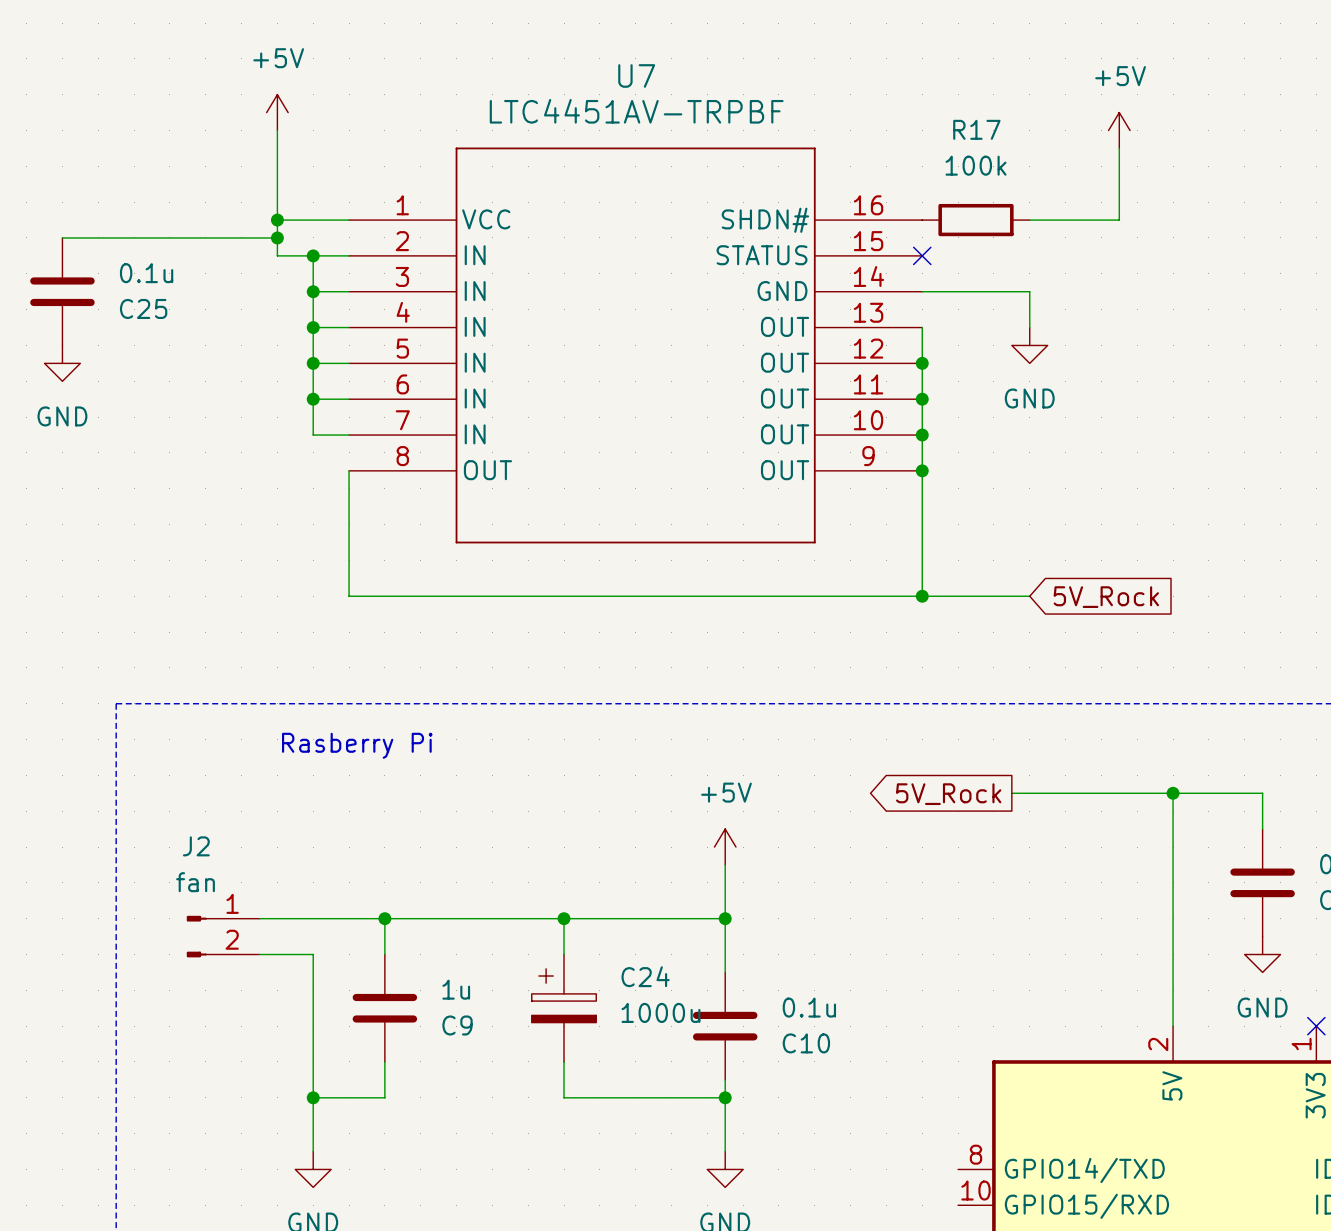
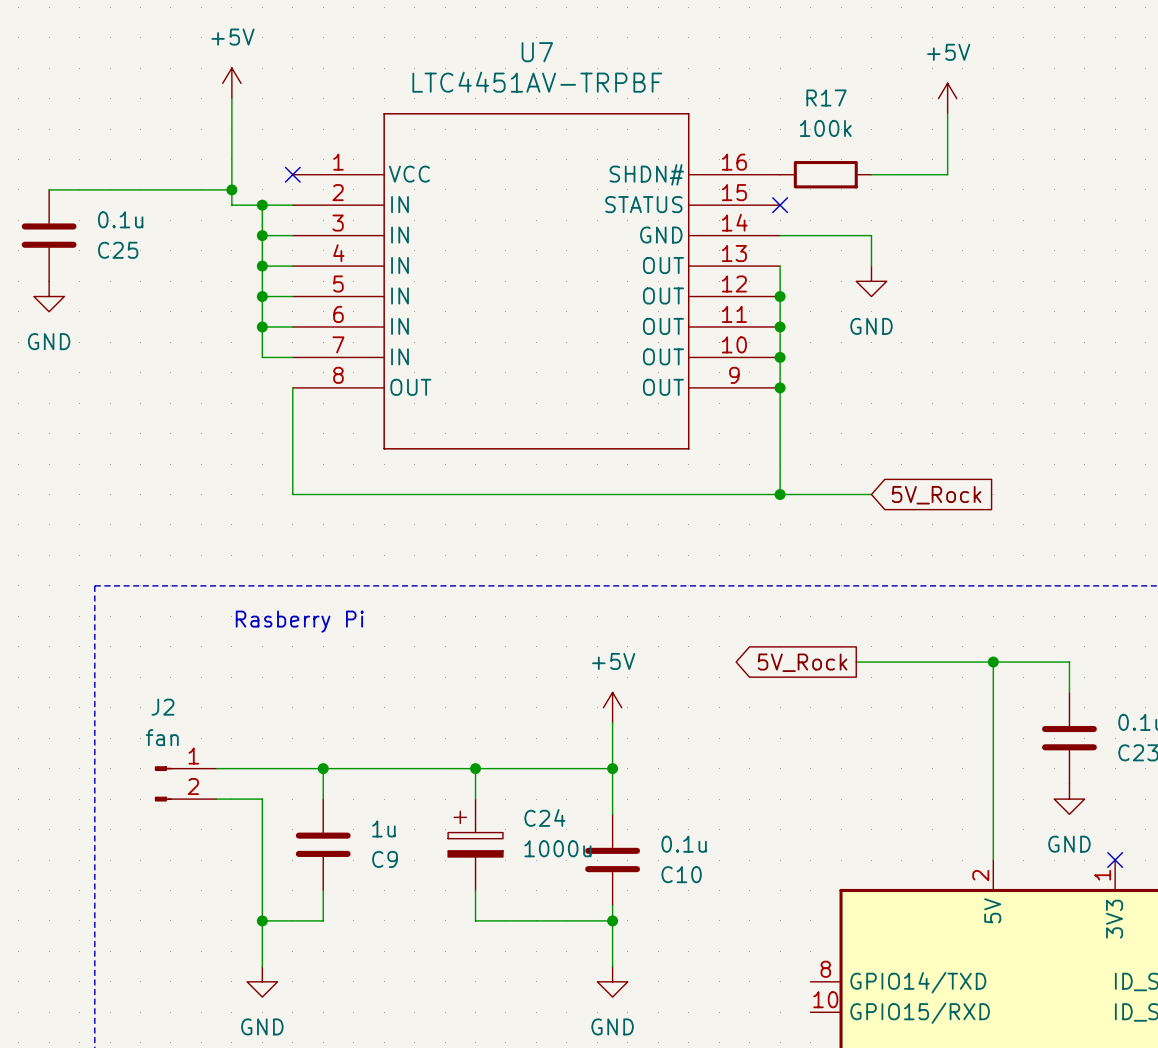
wire: (277, 220) (349, 220) -> none
junction: (277, 220) -> none
no-connect mark: none -> (292, 174)

